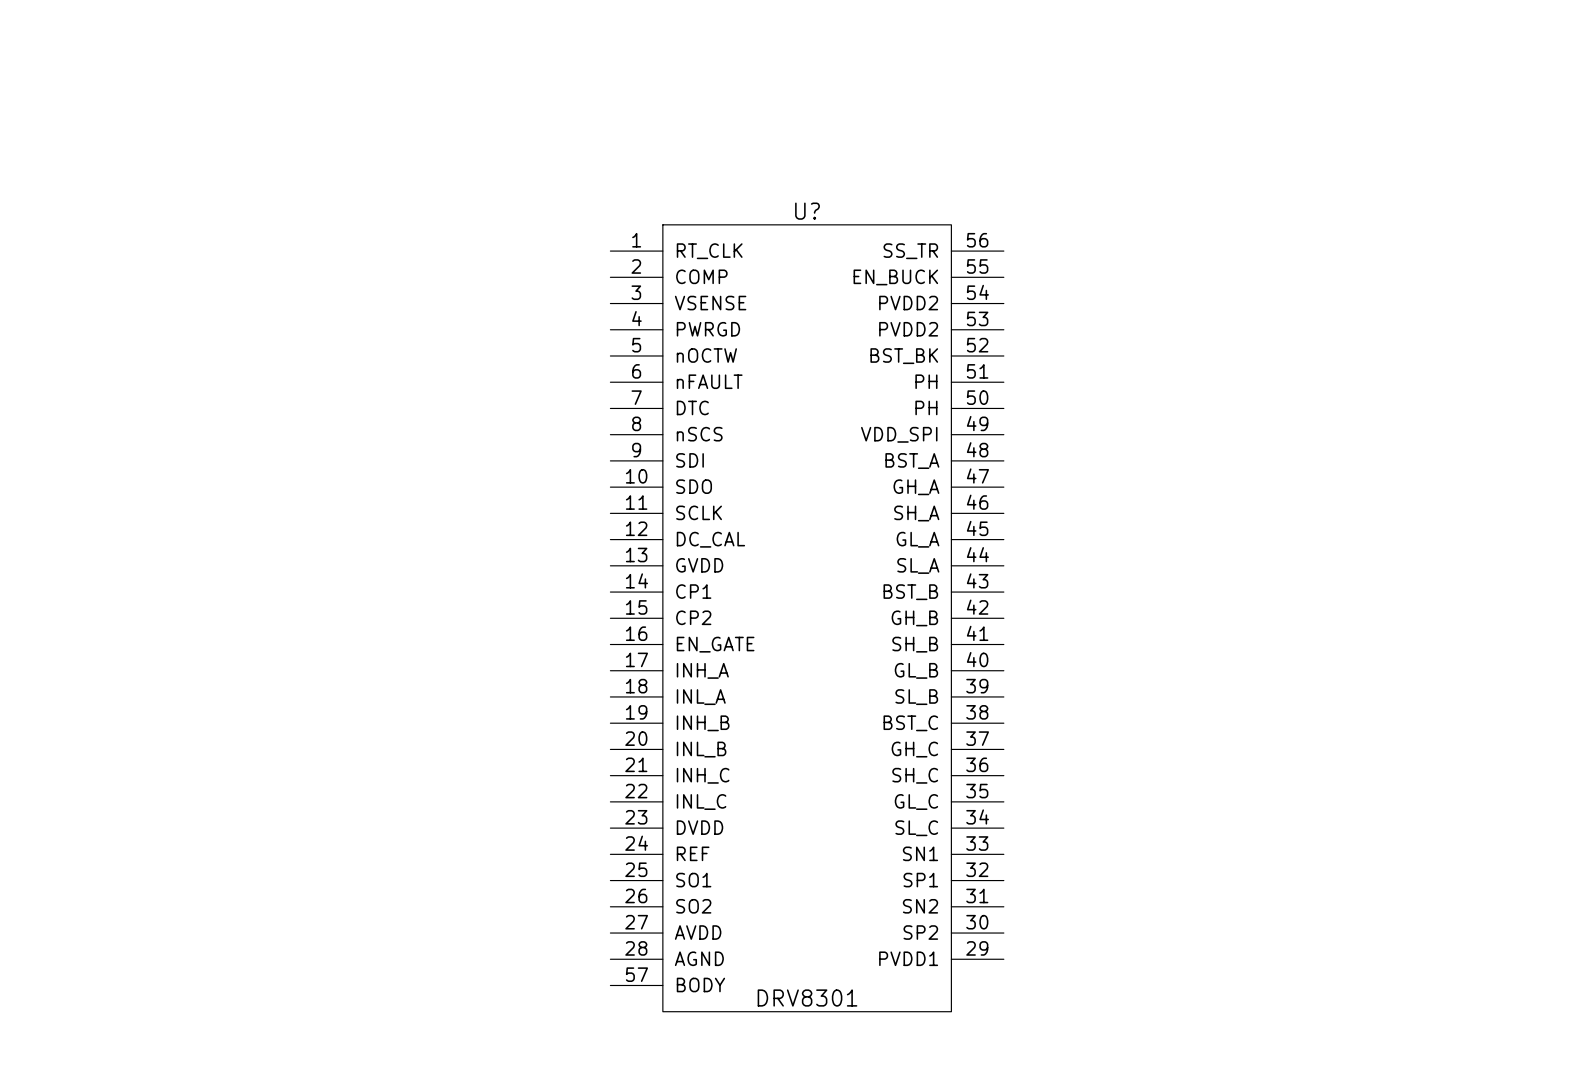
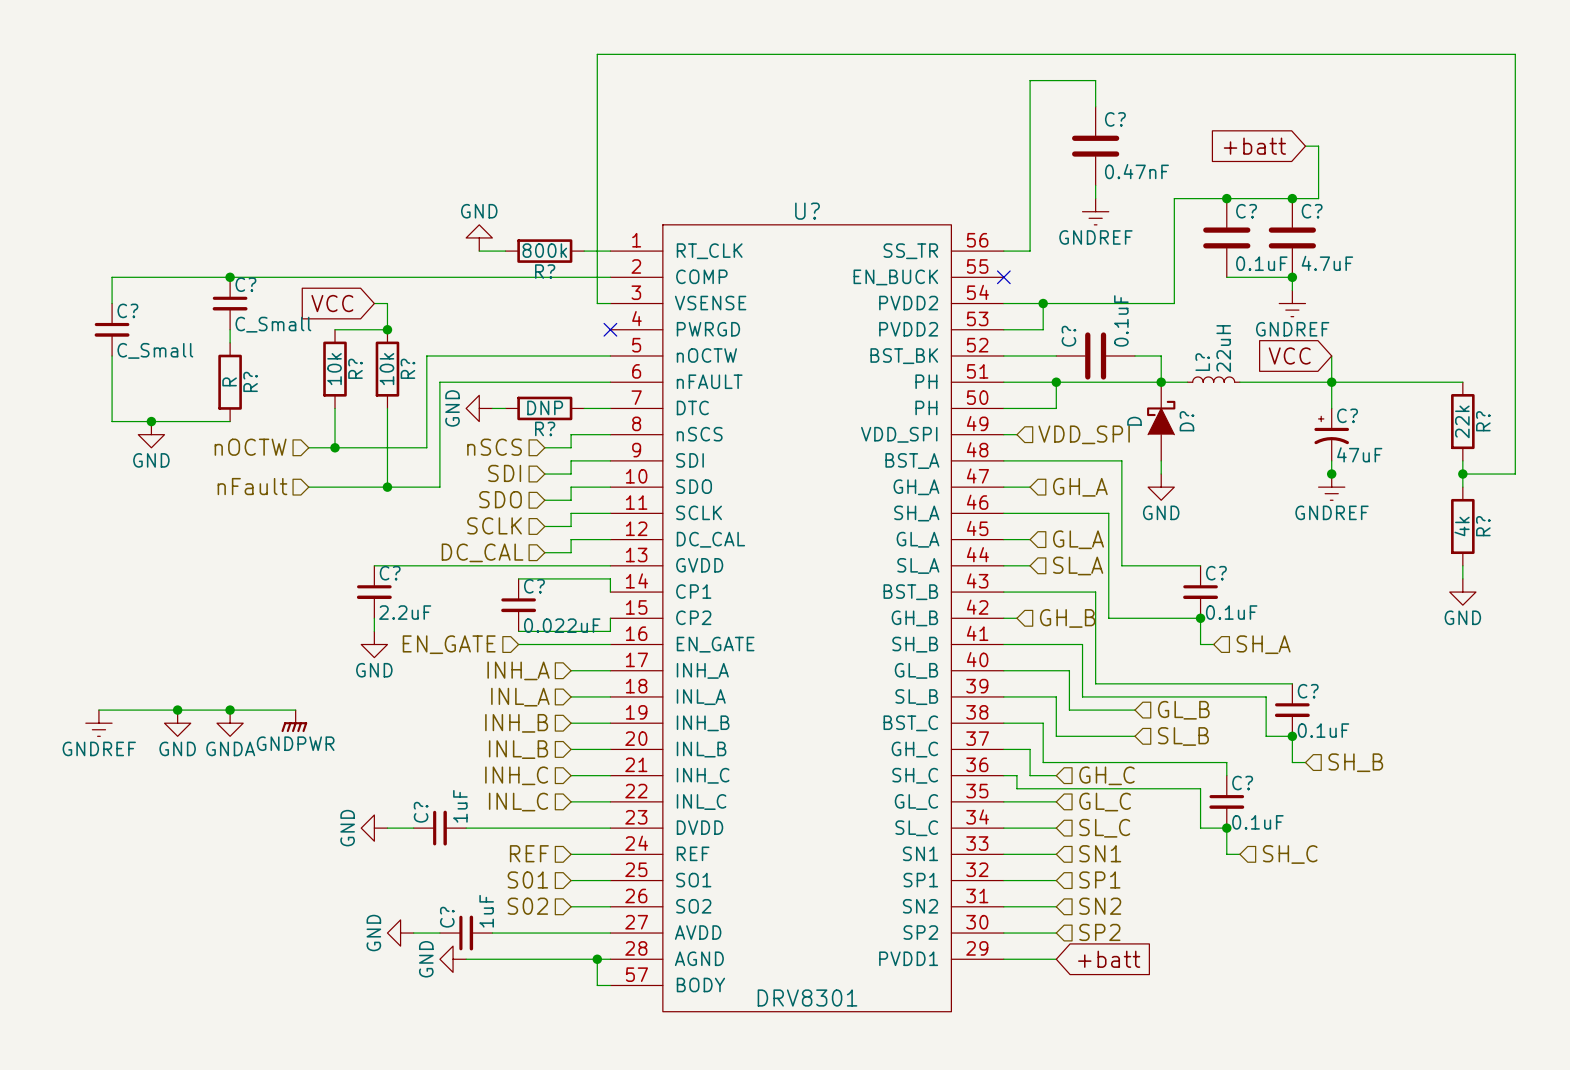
wire: none -> (1095, 106) (1095, 80) (1030, 80) (1030, 251) (1003, 251)
C?: none -> 0.47nF (1095, 146)
global label: none -> +batt (1254, 146)
wire: none -> (1305, 146) (1318, 146) (1318, 198) (1174, 198) (1174, 303) (1003, 303)
wire: none -> (1095, 185) (1095, 198)
junction: none -> (1226, 198)
junction: none -> (1292, 198)
power symbol: none -> GNDREF (1095, 211)
power symbol: none -> GND (479, 237)
C?: none -> 0.1uF (1226, 237)
C?: none -> 4.7uF (1292, 237)
wire: none -> (479, 251) (505, 251)
R?: none -> 800k (544, 251)
wire: none -> (584, 251) (610, 251)
junction: none -> (230, 277)
wire: none -> (610, 277) (112, 277) (112, 303)
no-connect mark: none -> (1003, 277)
wire: none -> (1226, 277) (1292, 277) (1292, 290)
junction: none -> (1292, 277)
C?: none -> C_Small (230, 303)
global label: none -> VCC (332, 303)
wire: none -> (374, 303) (387, 303) (387, 329) (335, 329)
wire: none -> (610, 303) (597, 303) (597, 54) (1515, 54) (1515, 474) (1462, 474)
wire: none -> (1043, 303) (1043, 329) (1003, 329)
junction: none -> (1043, 303)
power symbol: none -> GNDREF (1292, 303)
C?: none -> C_Small (112, 329)
wire: none -> (230, 329) (230, 342)
junction: none -> (387, 329)
no-connect mark: none -> (610, 329)
wire: none -> (112, 355) (112, 421) (230, 421)
wire: none -> (610, 355) (426, 355) (426, 447) (308, 447)
wire: none -> (1003, 355) (1056, 355)
C?: none -> 0.1uF (1095, 355)
wire: none -> (1134, 355) (1161, 355) (1161, 382)
global label: none -> VCC (1289, 355)
wire: none -> (1331, 355) (1331, 408)
R?: none -> 10k (335, 369)
R?: none -> 10k (387, 369)
L?: none -> 22uH (1213, 379)
R?: none -> R (230, 382)
wire: none -> (610, 382) (439, 382) (439, 487) (308, 487)
wire: none -> (1003, 382) (1187, 382)
wire: none -> (1056, 382) (1056, 408) (1003, 408)
junction: none -> (1056, 382)
junction: none -> (1161, 382)
wire: none -> (1239, 382) (1462, 382)
junction: none -> (1331, 382)
wire: none -> (335, 408) (335, 447)
wire: none -> (387, 408) (387, 487)
power symbol: none -> GND (479, 408)
wire: none -> (492, 408) (505, 408)
R?: none -> DNP (544, 408)
wire: none -> (584, 408) (610, 408)
junction: none -> (151, 421)
D?: none -> D (1161, 421)
R?: none -> 22k (1462, 421)
power symbol: none -> GND (151, 434)
wire: none -> (610, 434) (571, 434) (571, 447) (544, 447)
wire: none -> (1003, 434) (1016, 434)
hierarchical label: none -> VDD_SPI (1084, 434)
C?: none -> 47uF (1331, 434)
hierarchical label: none -> nOCTW (250, 447)
junction: none -> (335, 447)
hierarchical label: none -> nSCS (494, 447)
wire: none -> (610, 460) (571, 460) (571, 474) (544, 474)
wire: none -> (1003, 460) (1121, 460) (1121, 565) (1200, 565)
wire: none -> (1161, 460) (1161, 474)
wire: none -> (1331, 460) (1331, 474)
wire: none -> (1462, 460) (1462, 487)
hierarchical label: none -> SDI (504, 473)
junction: none -> (1331, 474)
junction: none -> (1462, 474)
hierarchical label: none -> nFault (252, 486)
junction: none -> (387, 487)
wire: none -> (610, 487) (571, 487) (571, 500) (544, 500)
wire: none -> (1003, 487) (1030, 487)
hierarchical label: none -> GH_A (1080, 487)
power symbol: none -> GND (1161, 487)
power symbol: none -> GNDREF (1331, 487)
hierarchical label: none -> SDO (500, 499)
wire: none -> (610, 513) (571, 513) (571, 526) (544, 526)
wire: none -> (1003, 513) (1108, 513) (1108, 618) (1200, 618) (1200, 644) (1213, 644)
hierarchical label: none -> SCLK (494, 525)
R?: none -> 4k (1462, 526)
wire: none -> (610, 539) (571, 539) (571, 552) (544, 552)
wire: none -> (1003, 539) (1030, 539)
hierarchical label: none -> GL_A (1078, 539)
hierarchical label: none -> DC_CAL (482, 552)
wire: none -> (374, 565) (610, 565)
wire: none -> (1003, 565) (1030, 565)
hierarchical label: none -> SL_A (1078, 565)
wire: none -> (1462, 565) (1462, 578)
wire: none -> (518, 578) (610, 578) (610, 592)
C?: none -> 2.2uF (374, 592)
wire: none -> (1003, 592) (1095, 592) (1095, 683) (1292, 683)
C?: none -> 0.1uF (1200, 592)
power symbol: none -> GND (1462, 592)
C?: none -> 0.022uF (518, 605)
wire: none -> (374, 618) (374, 631)
wire: none -> (610, 618) (610, 631) (518, 631)
wire: none -> (1003, 618) (1016, 618)
hierarchical label: none -> GH_B (1067, 618)
junction: none -> (1200, 618)
power symbol: none -> GND (374, 644)
hierarchical label: none -> EN_GATE (449, 644)
wire: none -> (518, 644) (610, 644)
wire: none -> (1003, 644) (1082, 644) (1082, 696) (1266, 696) (1266, 736) (1292, 736) (1292, 762) (1305, 762)
hierarchical label: none -> SH_A (1263, 644)
hierarchical label: none -> INH_A (518, 670)
wire: none -> (571, 670) (610, 670)
wire: none -> (1003, 670) (1069, 670) (1069, 710) (1134, 710)
wire: none -> (571, 696) (610, 696)
wire: none -> (1003, 696) (1056, 696) (1056, 736) (1134, 736)
hierarchical label: none -> INL_A (520, 697)
wire: none -> (98, 710) (295, 710)
junction: none -> (177, 710)
junction: none -> (230, 710)
hierarchical label: none -> GL_B (1183, 710)
C?: none -> 0.1uF (1292, 710)
power symbol: none -> GNDPWR (294, 721)
power symbol: none -> GNDREF (98, 723)
power symbol: none -> GND (177, 723)
power symbol: none -> GNDA (230, 723)
hierarchical label: none -> INH_B (516, 723)
wire: none -> (571, 723) (610, 723)
wire: none -> (1003, 723) (1043, 723) (1043, 762) (1226, 762) (1226, 775)
hierarchical label: none -> SL_B (1183, 736)
junction: none -> (1292, 736)
hierarchical label: none -> INL_B (518, 749)
wire: none -> (571, 749) (610, 749)
wire: none -> (1003, 749) (1030, 749) (1030, 775) (1056, 775)
hierarchical label: none -> SH_B (1355, 762)
hierarchical label: none -> INH_C (516, 775)
wire: none -> (571, 775) (610, 775)
wire: none -> (1003, 775) (1016, 775) (1016, 788) (1200, 788) (1200, 828) (1226, 828) (1226, 854) (1239, 854)
hierarchical label: none -> GH_C (1106, 775)
wire: none -> (571, 801) (610, 801)
wire: none -> (1003, 801) (1056, 801)
C?: none -> 0.1uF (1226, 801)
hierarchical label: none -> INL_C (518, 802)
hierarchical label: none -> GL_C (1105, 802)
power symbol: none -> GND (374, 828)
wire: none -> (387, 828) (413, 828)
C?: none -> 1uF (439, 828)
wire: none -> (466, 828) (610, 828)
wire: none -> (1003, 828) (1056, 828)
hierarchical label: none -> SL_C (1104, 828)
junction: none -> (1226, 828)
hierarchical label: none -> REF (529, 853)
hierarchical label: none -> SN1 (1100, 853)
wire: none -> (571, 854) (610, 854)
wire: none -> (1003, 854) (1056, 854)
hierarchical label: none -> SH_C (1290, 854)
hierarchical label: none -> S01 (527, 879)
hierarchical label: none -> SP1 (1099, 879)
wire: none -> (571, 880) (610, 880)
wire: none -> (1003, 880) (1056, 880)
hierarchical label: none -> S02 (527, 906)
wire: none -> (571, 906) (610, 906)
wire: none -> (1003, 906) (1056, 906)
hierarchical label: none -> SN2 (1100, 906)
hierarchical label: none -> SP2 (1099, 932)
power symbol: none -> GND (400, 933)
wire: none -> (413, 933) (439, 933)
C?: none -> 1uF (466, 933)
wire: none -> (492, 933) (610, 933)
wire: none -> (1003, 933) (1056, 933)
power symbol: none -> GND (453, 959)
wire: none -> (466, 959) (610, 959)
wire: none -> (597, 959) (597, 985) (610, 985)
junction: none -> (597, 959)
wire: none -> (1003, 959) (1056, 959)
global label: none -> +batt (1109, 959)

